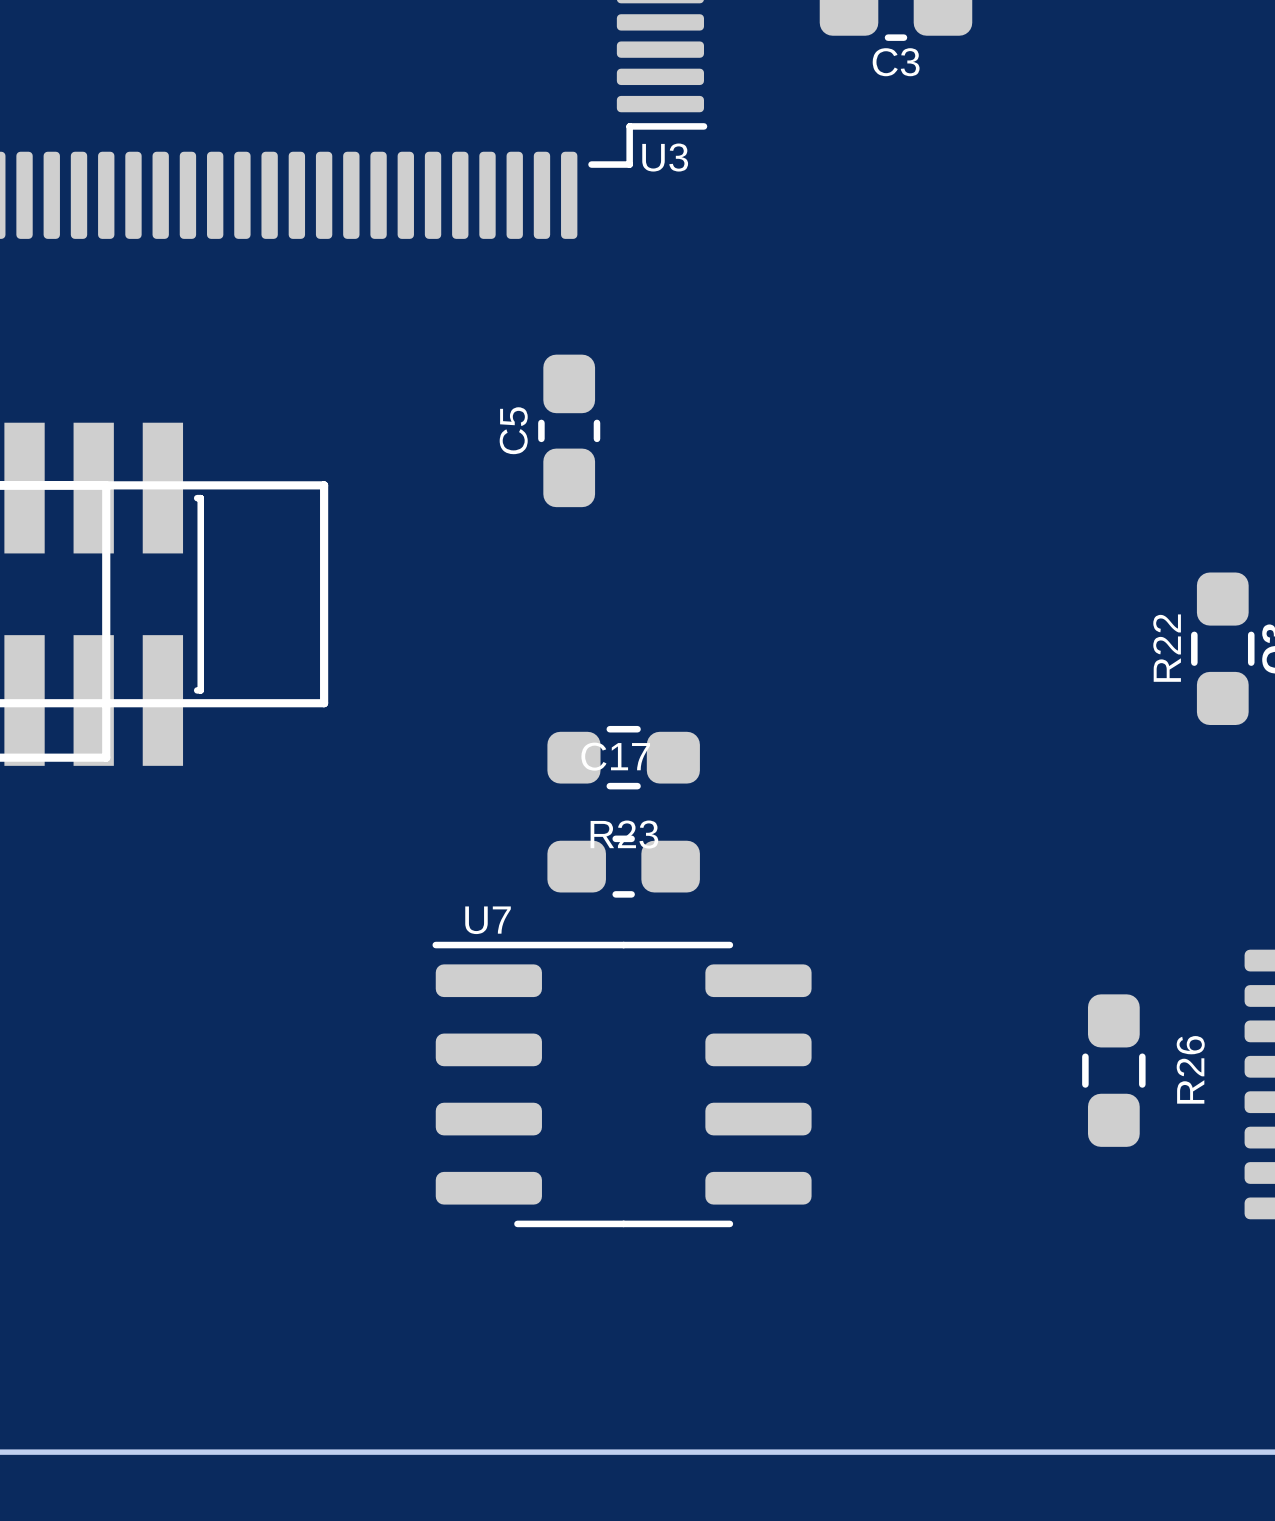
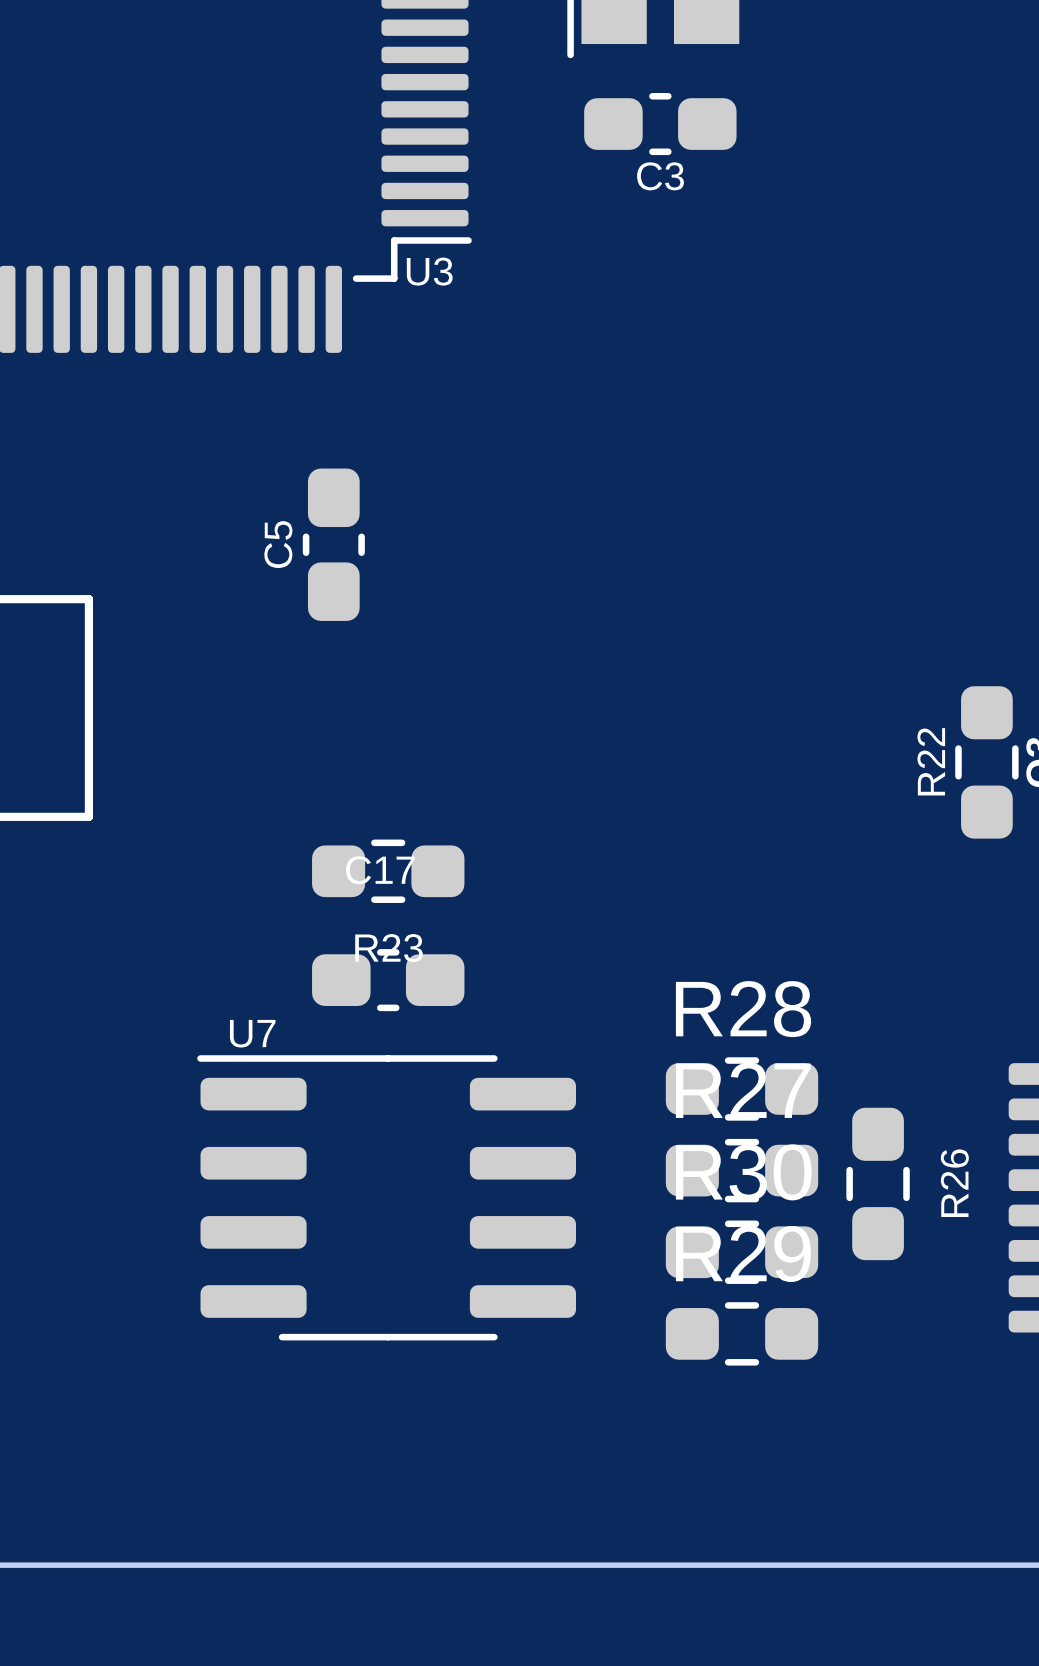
R28: none -> (742, 1088)
part: none -> (742, 1170)
part: none -> (742, 1252)
part: none -> (742, 1333)

